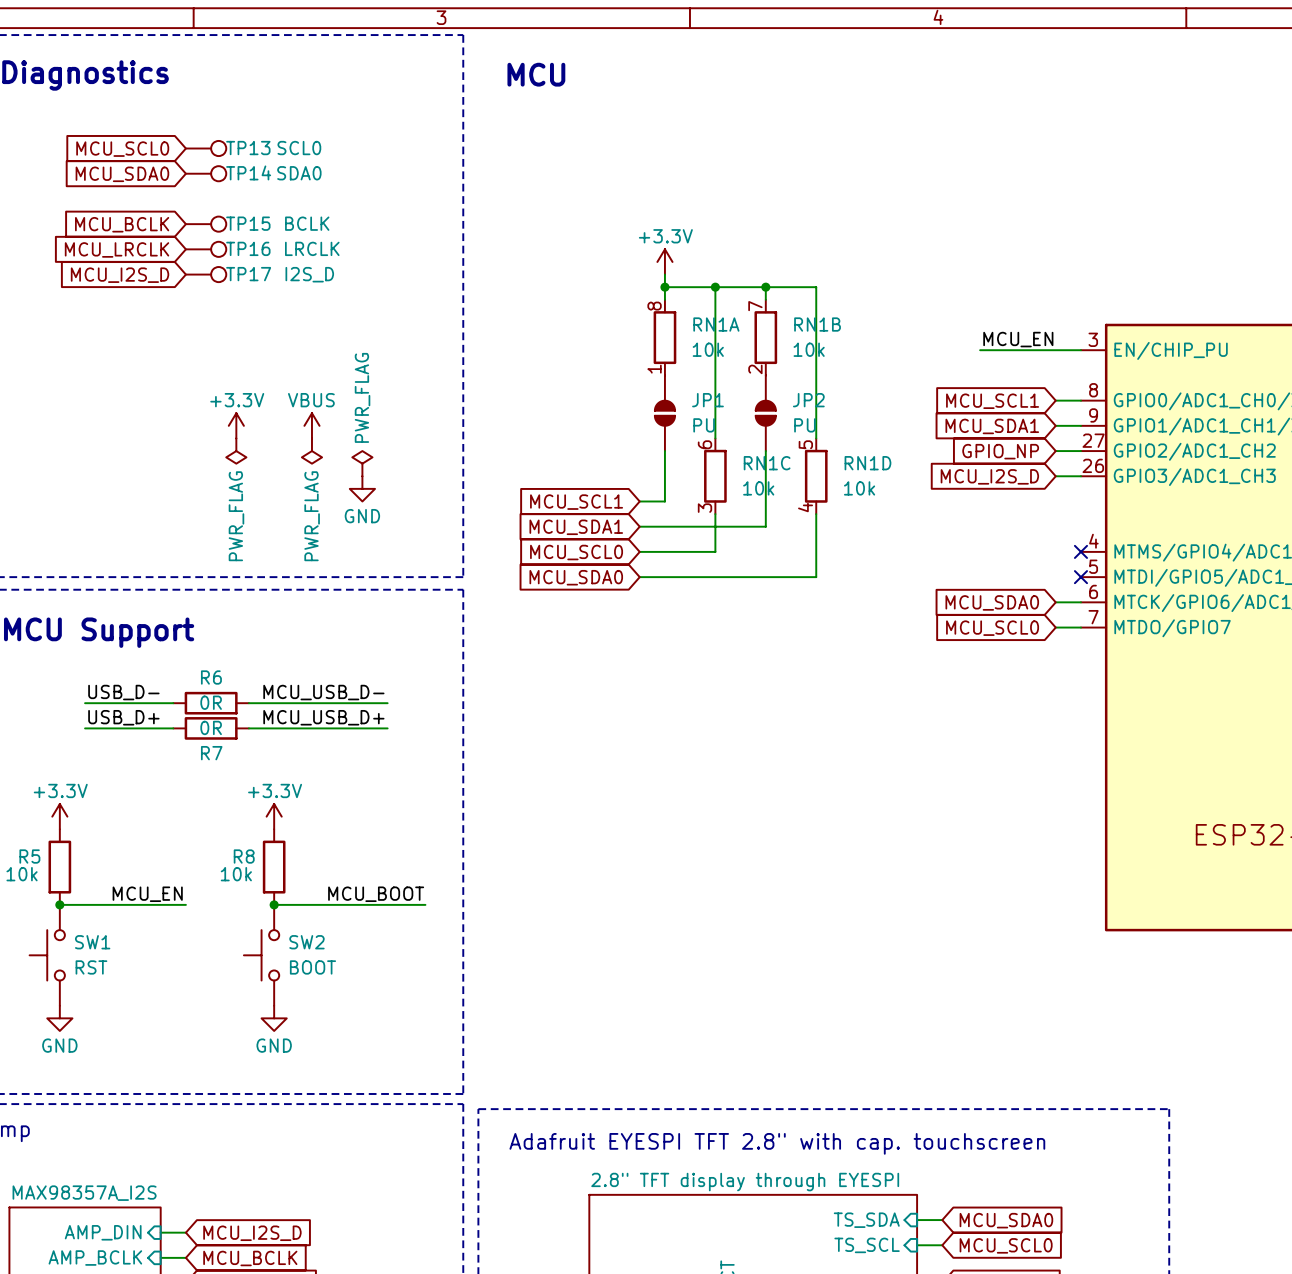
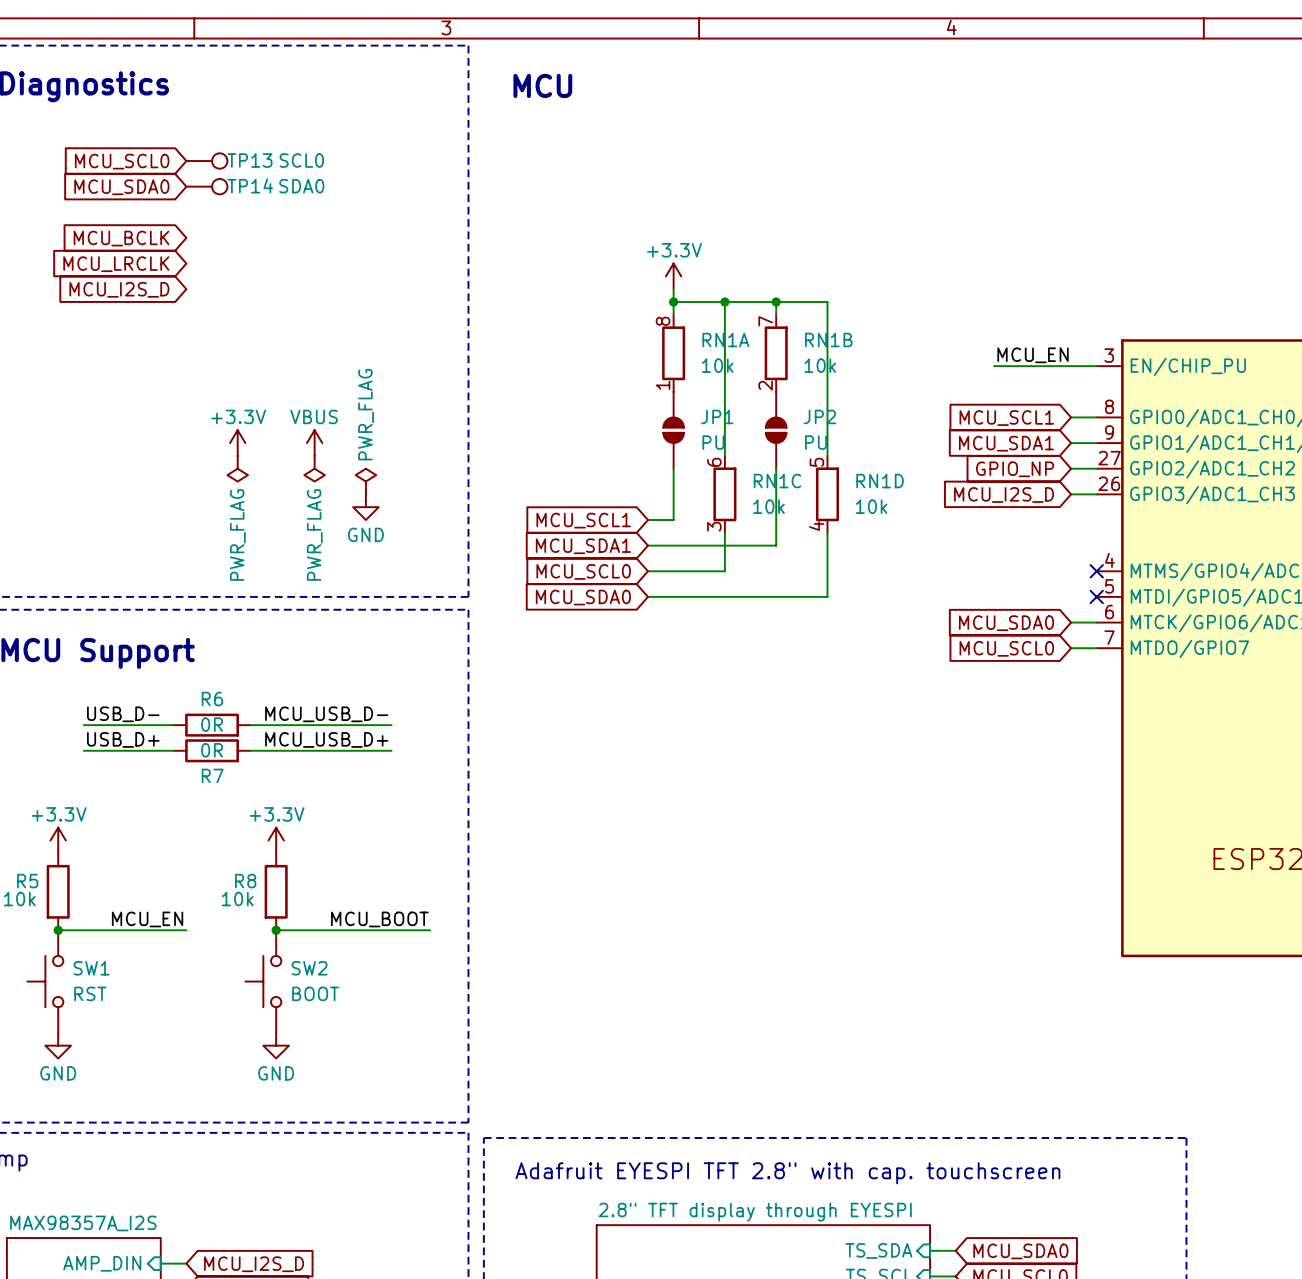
TP15: BCLK (206, 224) -> none
TP16: LRCLK (206, 249) -> none
TP17: I2S_D (206, 274) -> none

